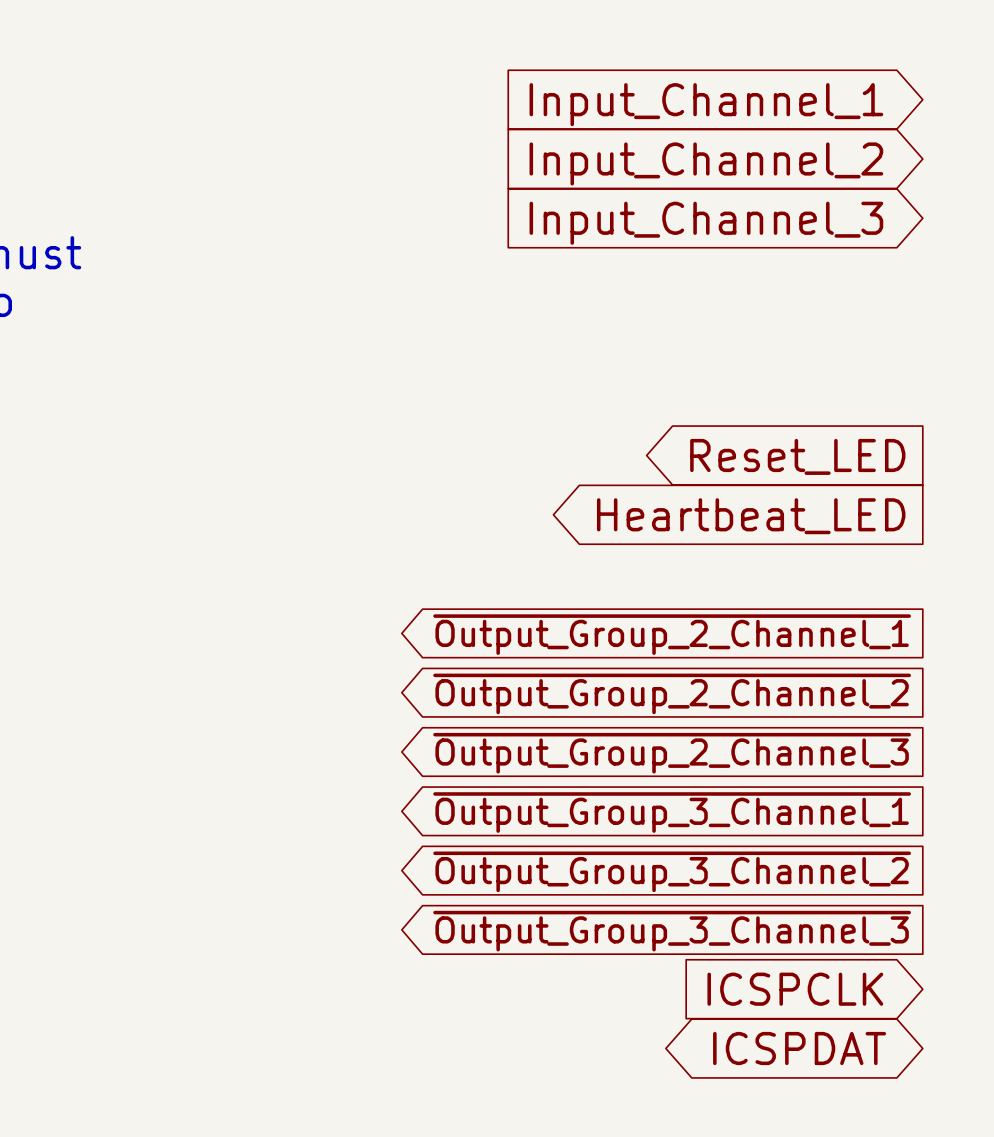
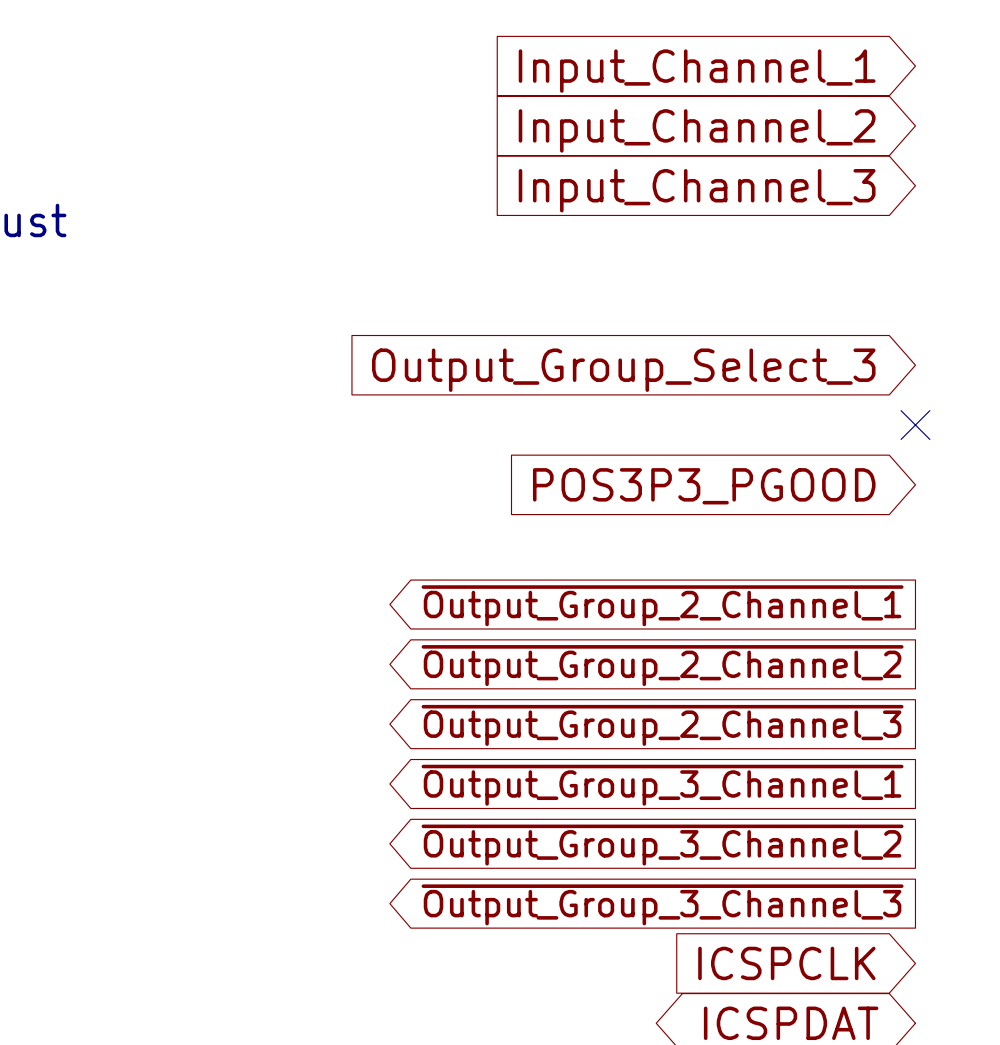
global label: none -> Output_Group_Select_3 (623, 370)
no-connect mark: none -> (915, 425)
global label: Reset_LED (797, 456) -> none
global label shape: output (751, 516) -> input (704, 486)
global label: Heartbeat_LED (751, 516) -> POS3P3_PGOOD (704, 486)

